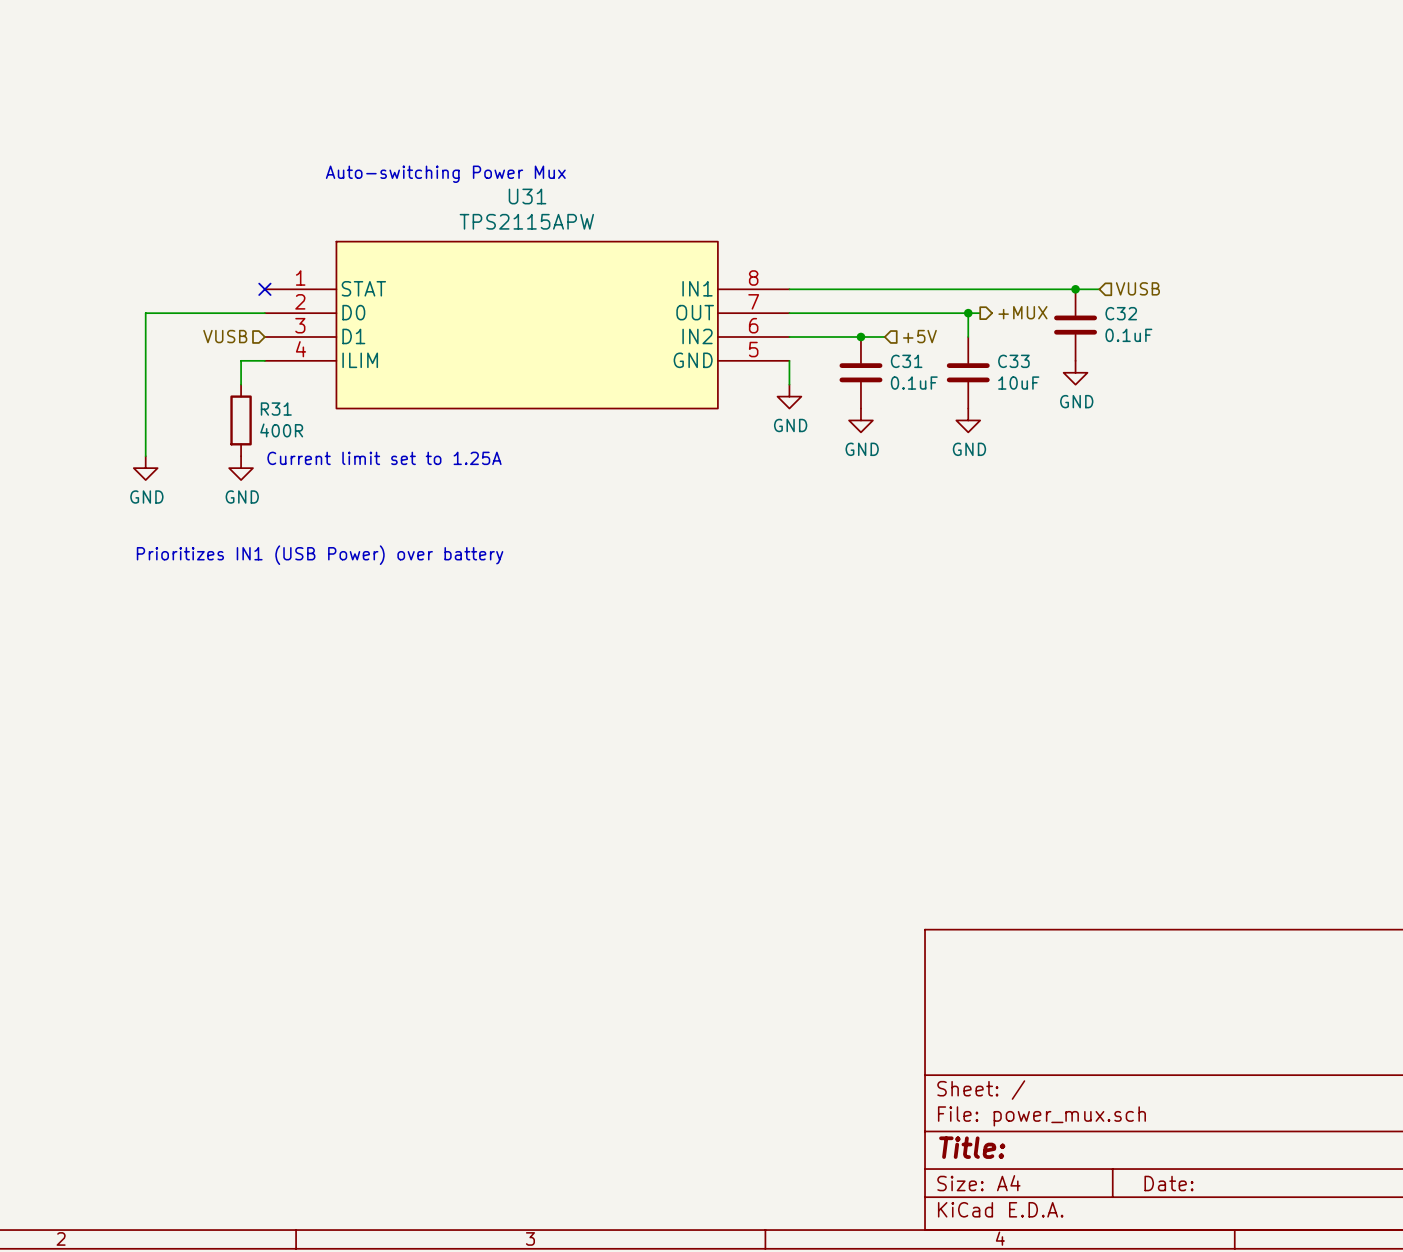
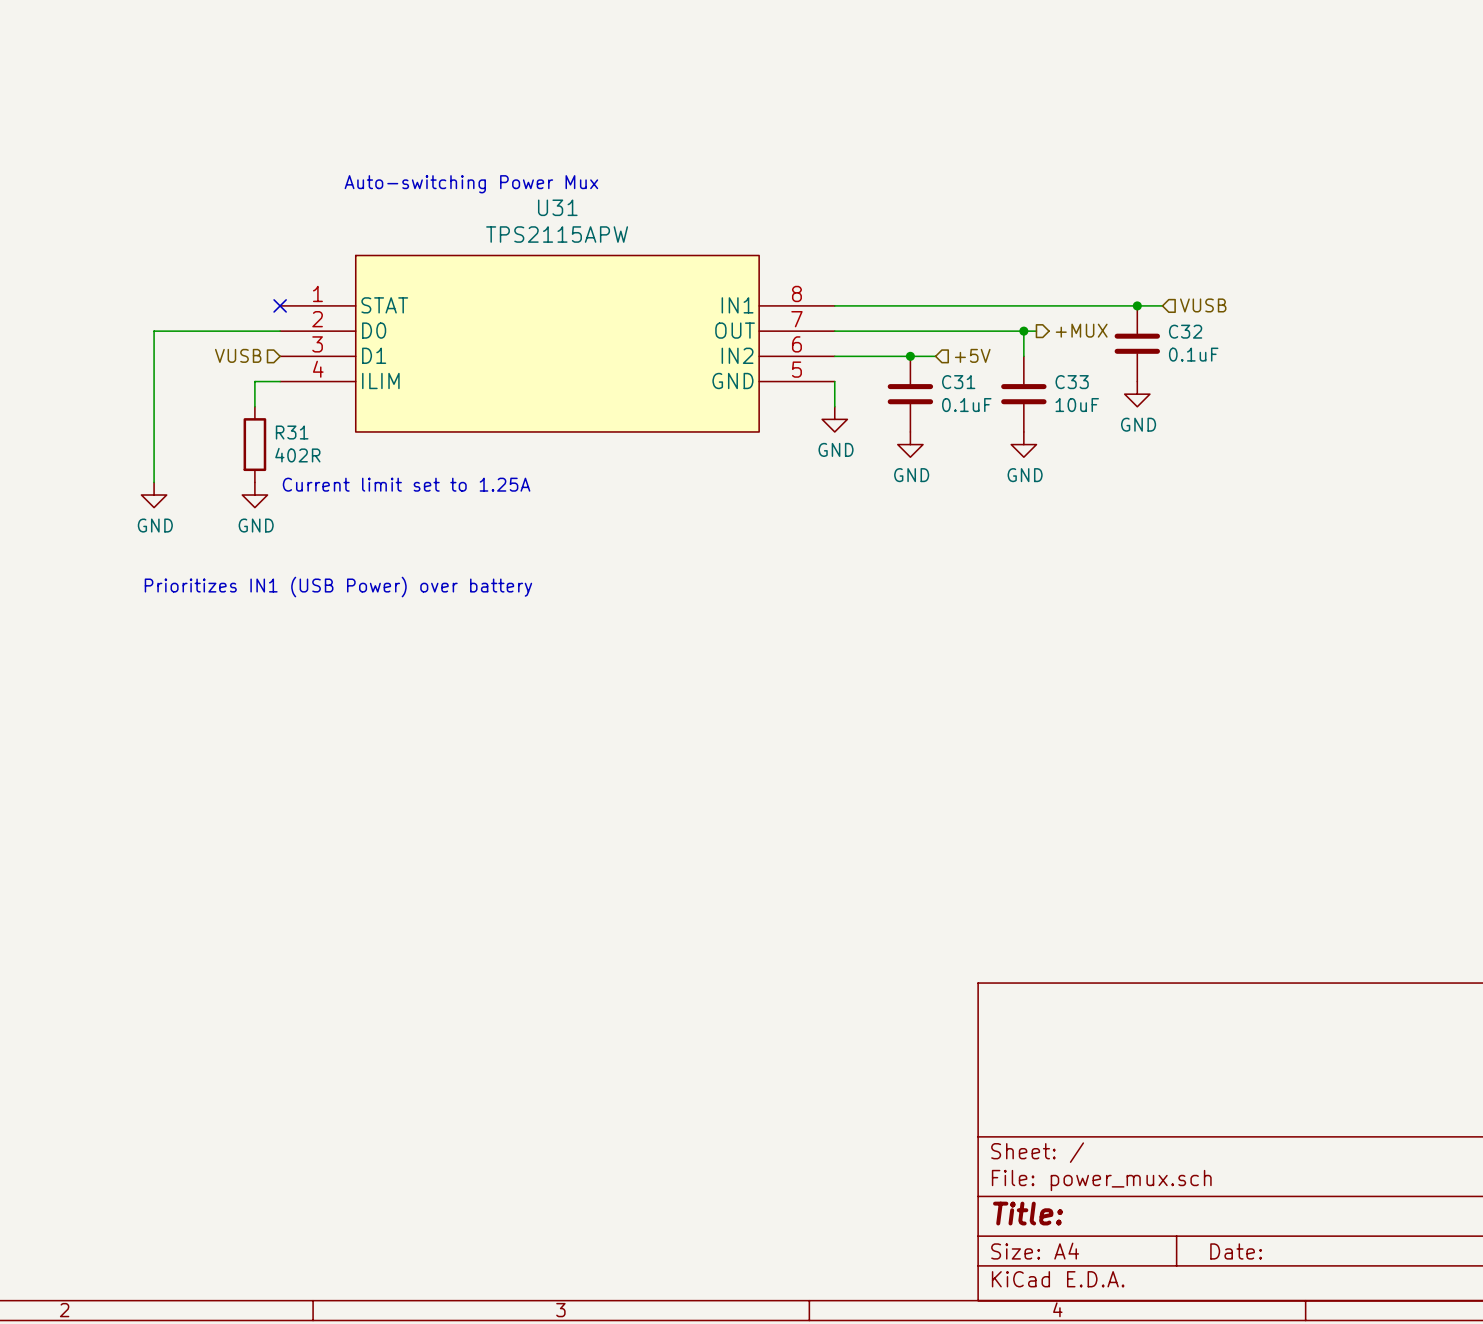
R31 value: 400R (281, 430) -> 402R (297, 455)

